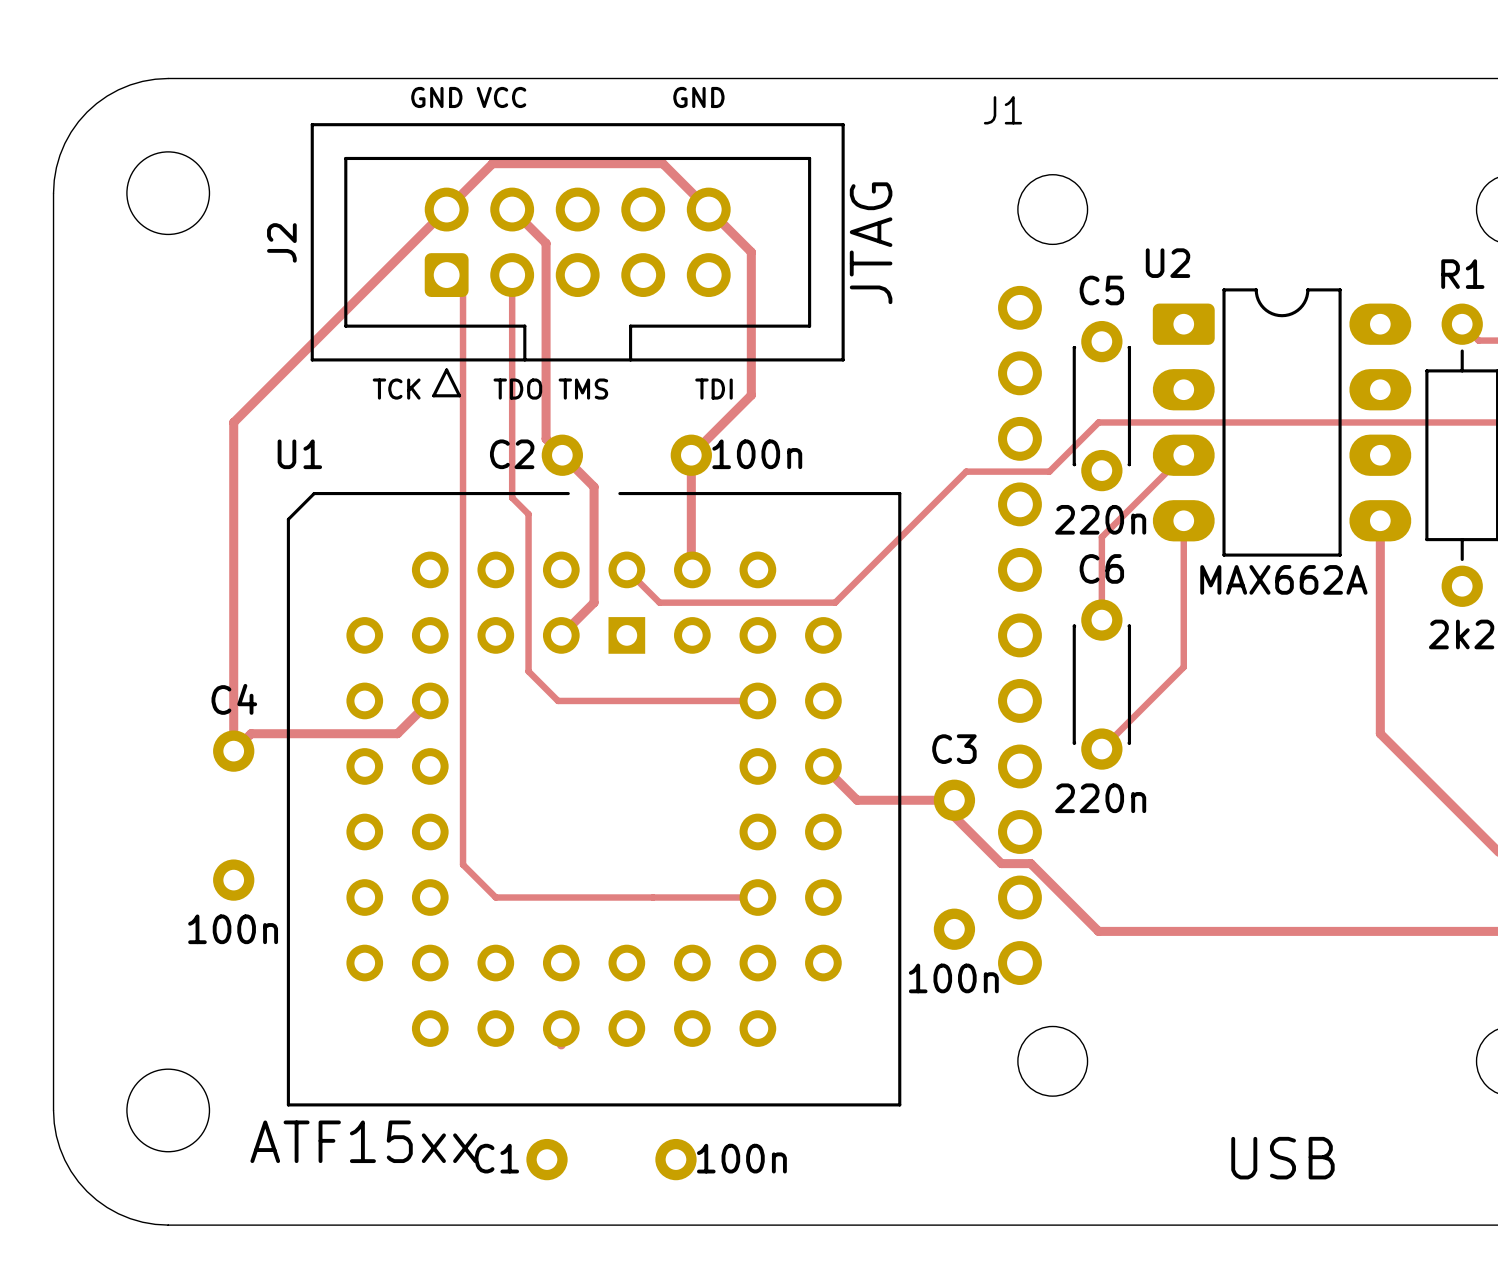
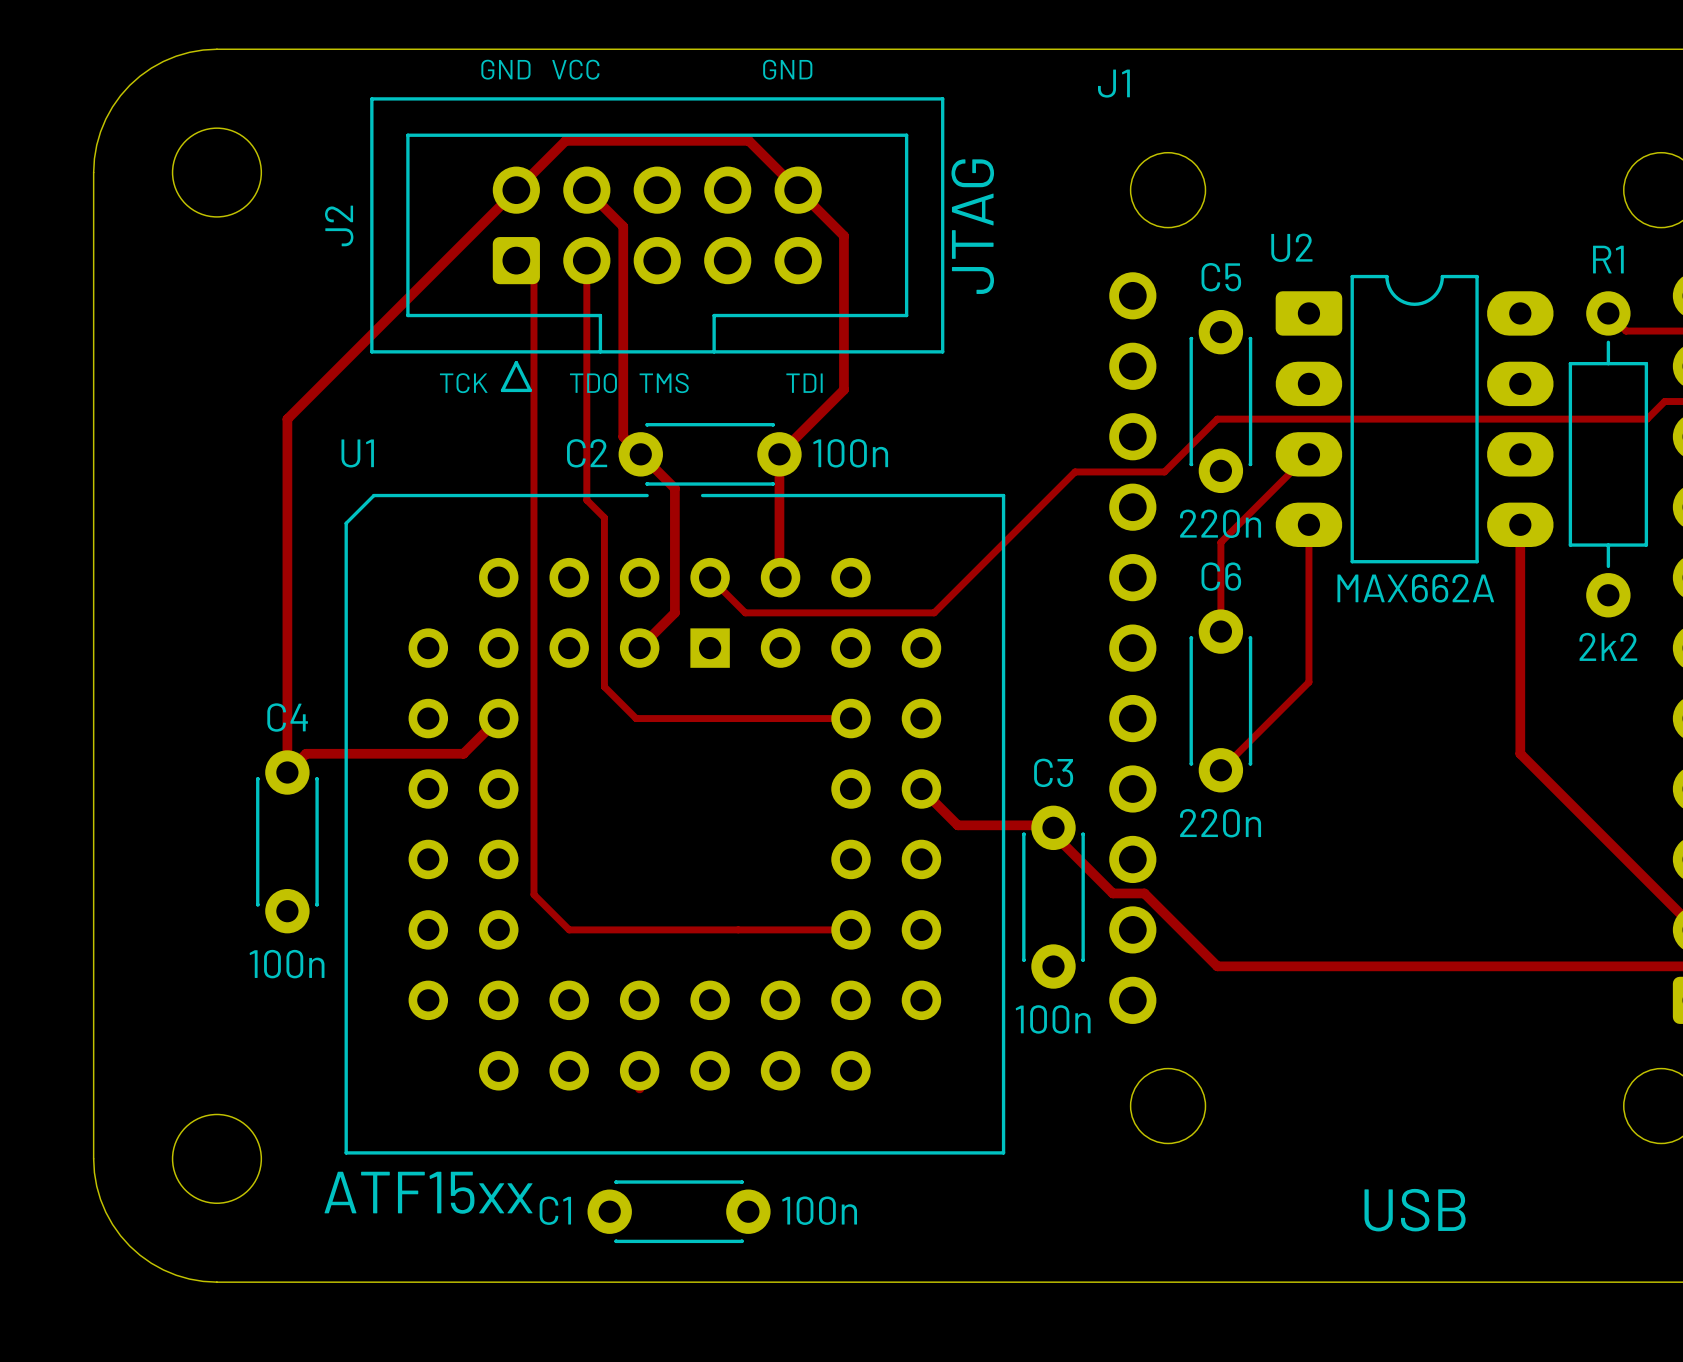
C2 side: bottom (626, 455) -> top (710, 454)
C4 side: bottom (233, 815) -> top (287, 841)
C3 side: bottom (954, 864) -> top (1053, 897)
C1 side: bottom (611, 1159) -> top (679, 1211)

